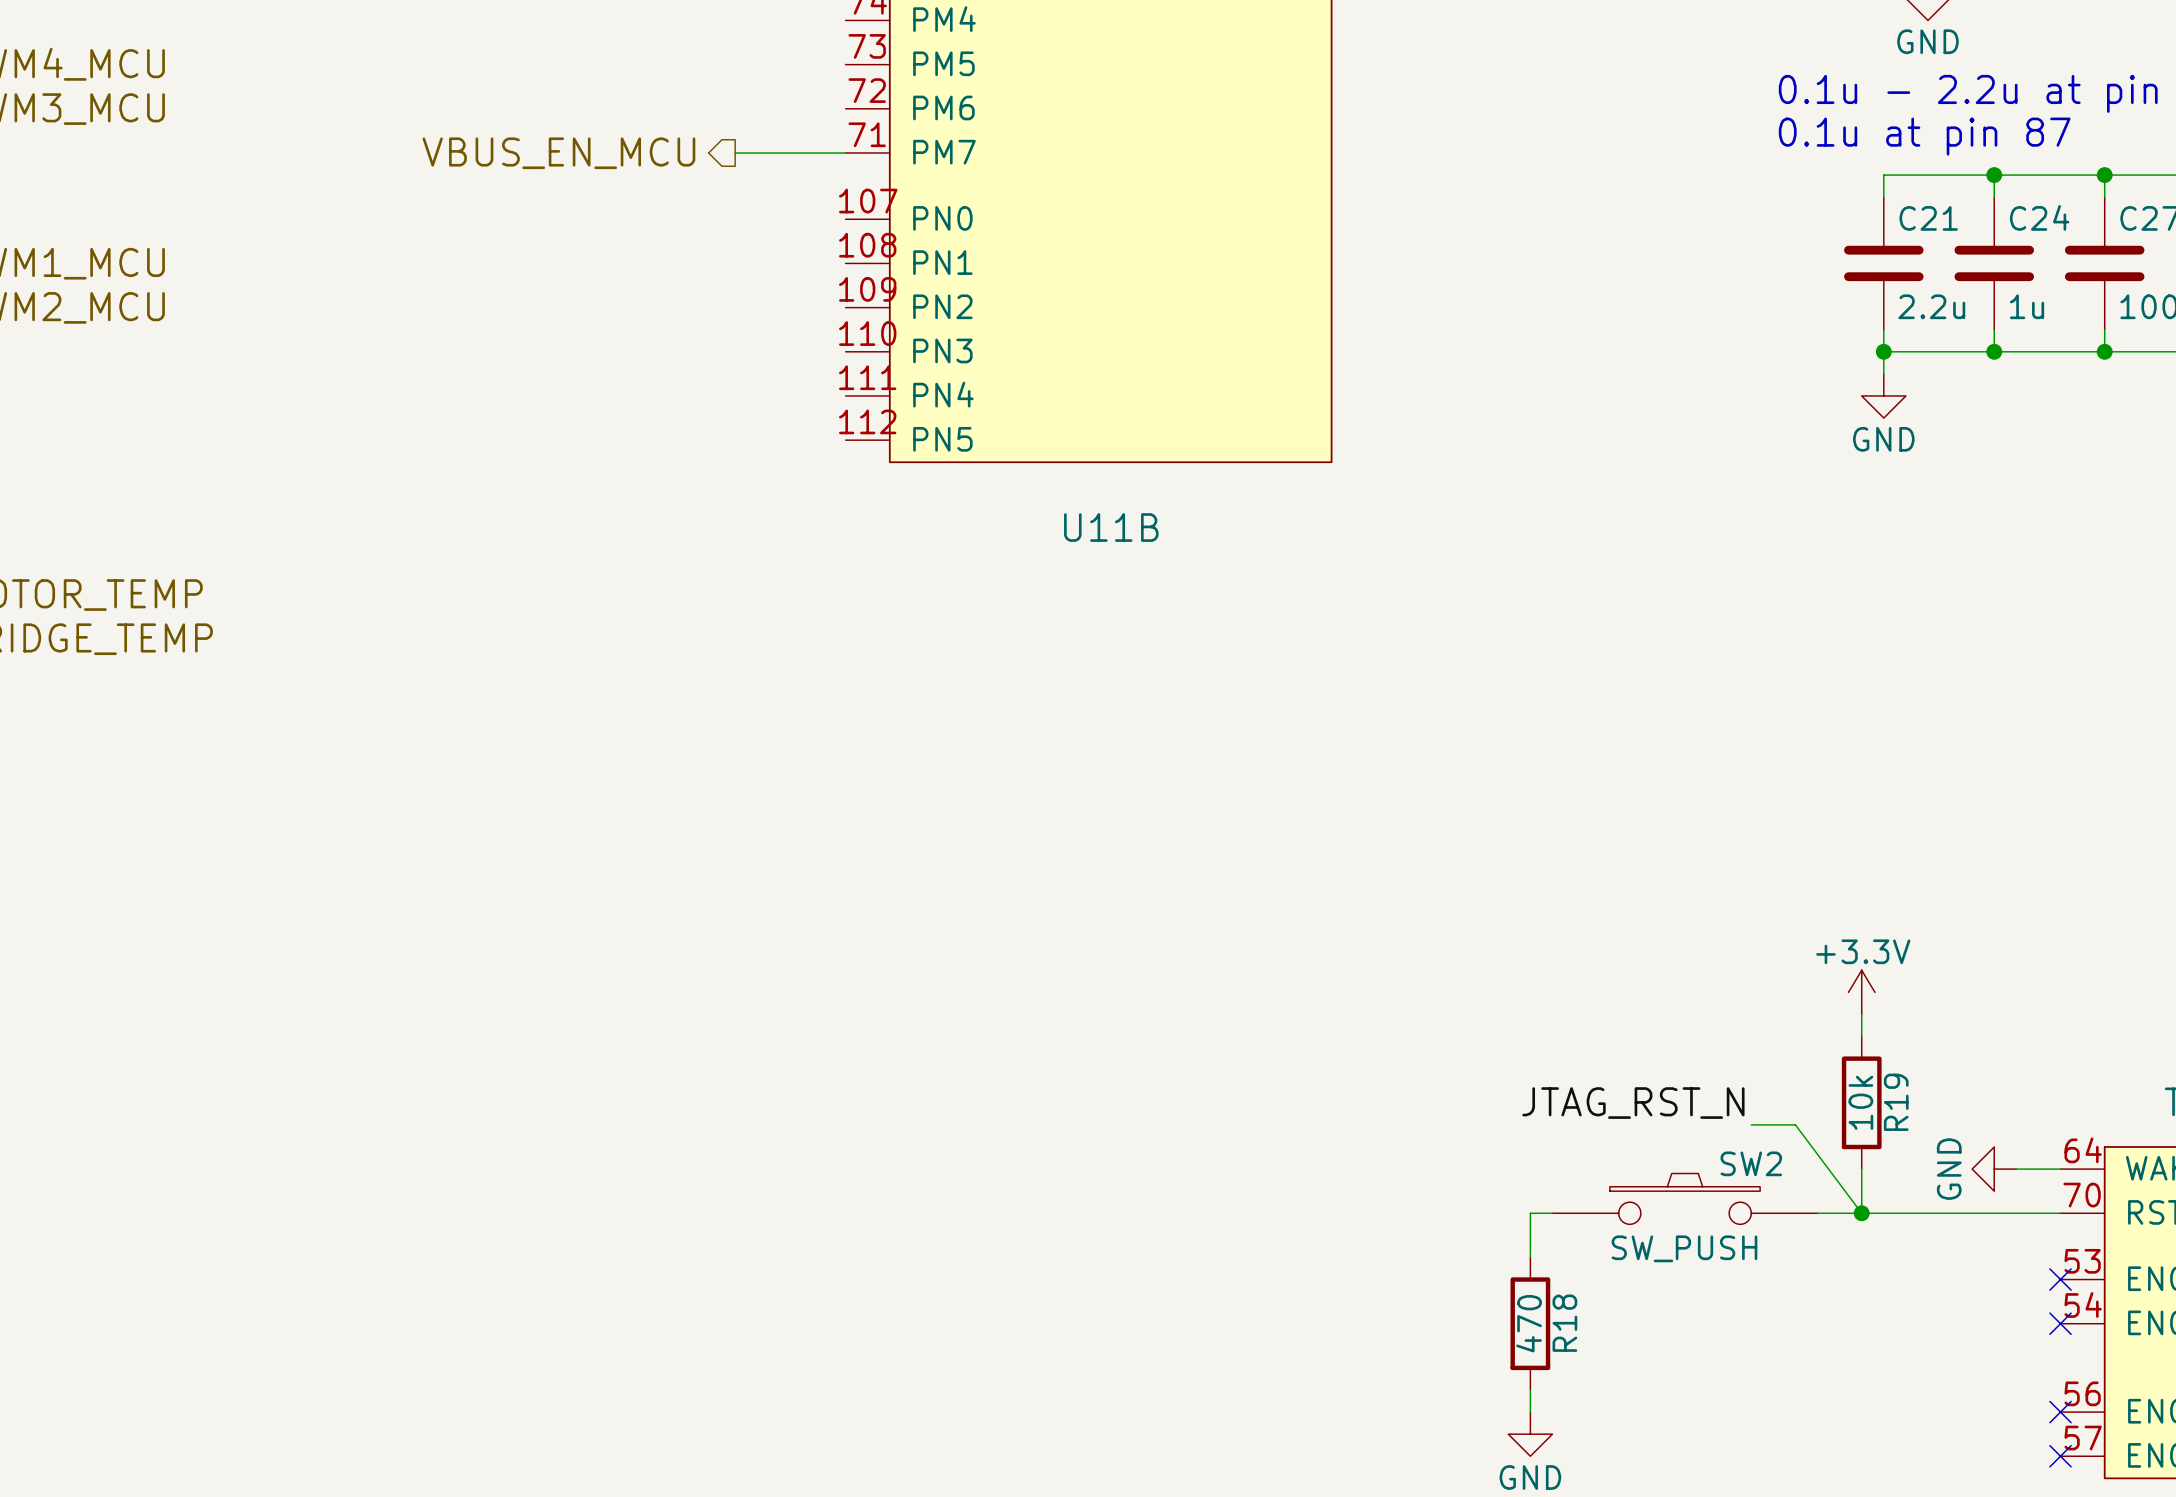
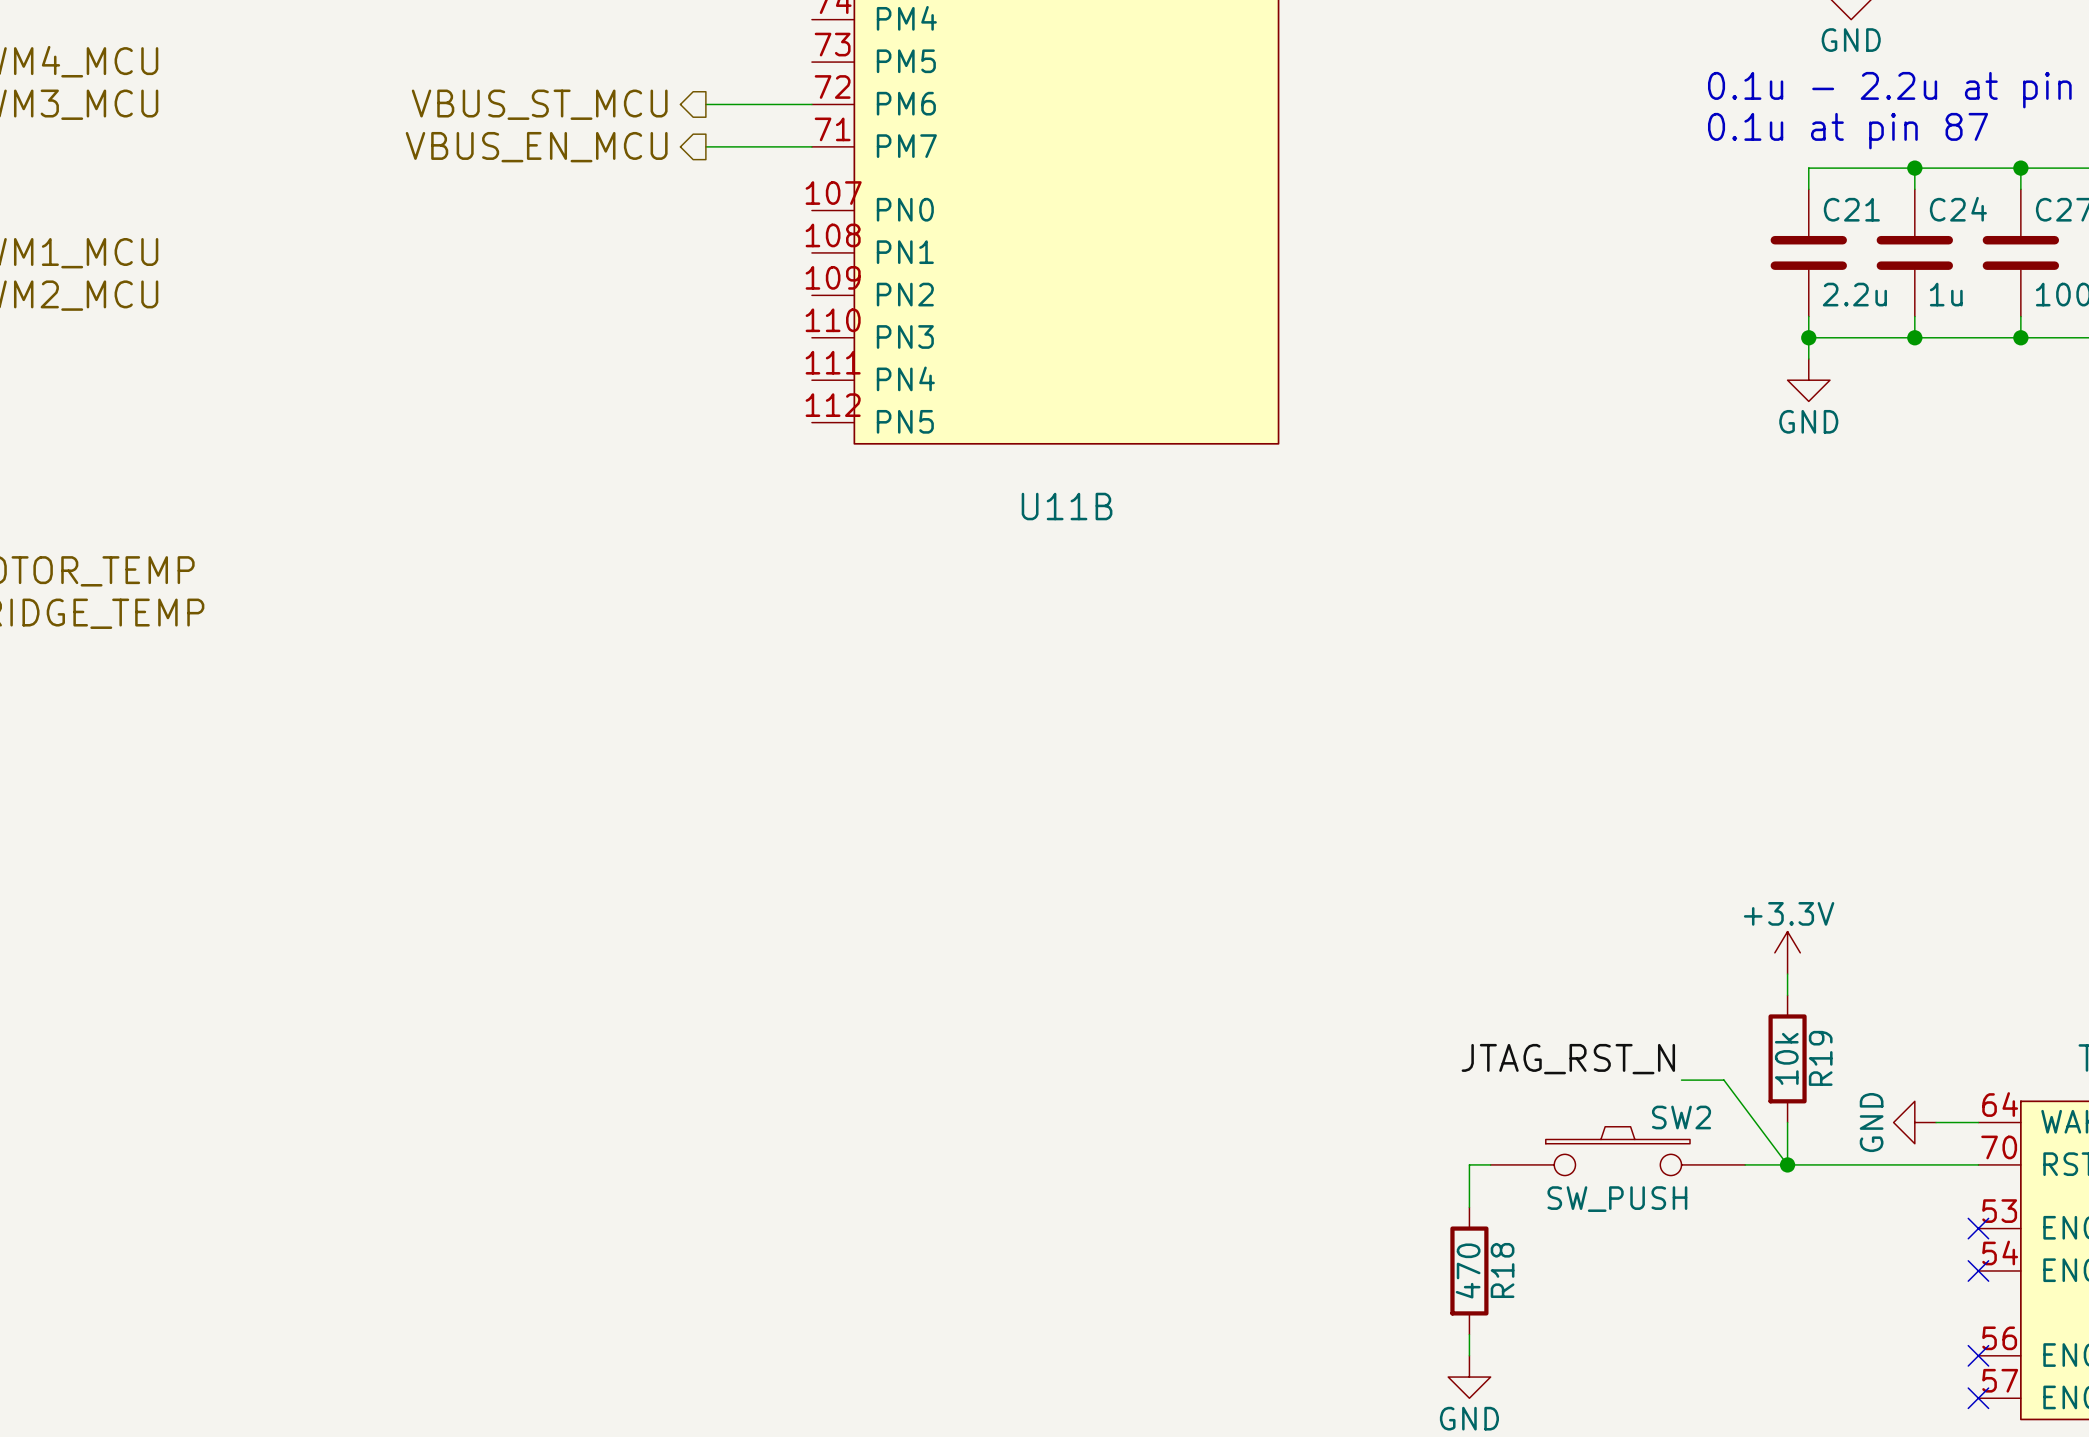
wire: none -> (705, 104) (811, 104)
hierarchical label: none -> VBUS_ST_MCU (539, 104)

